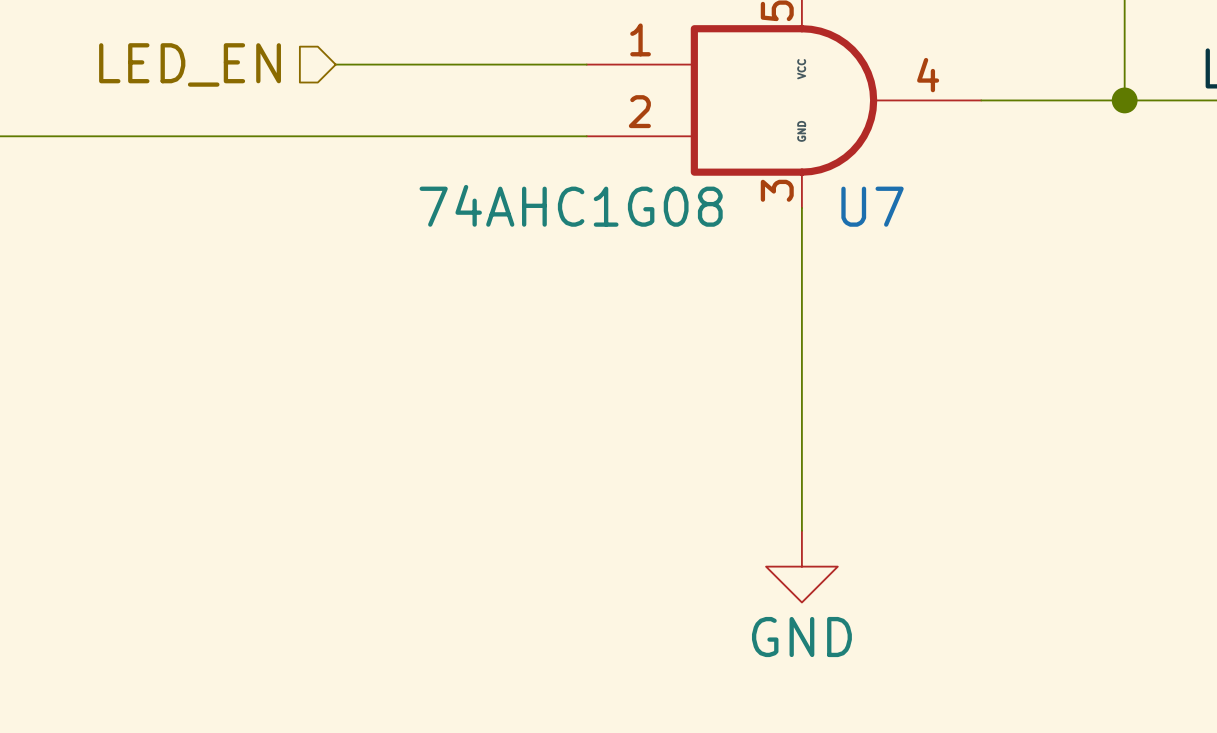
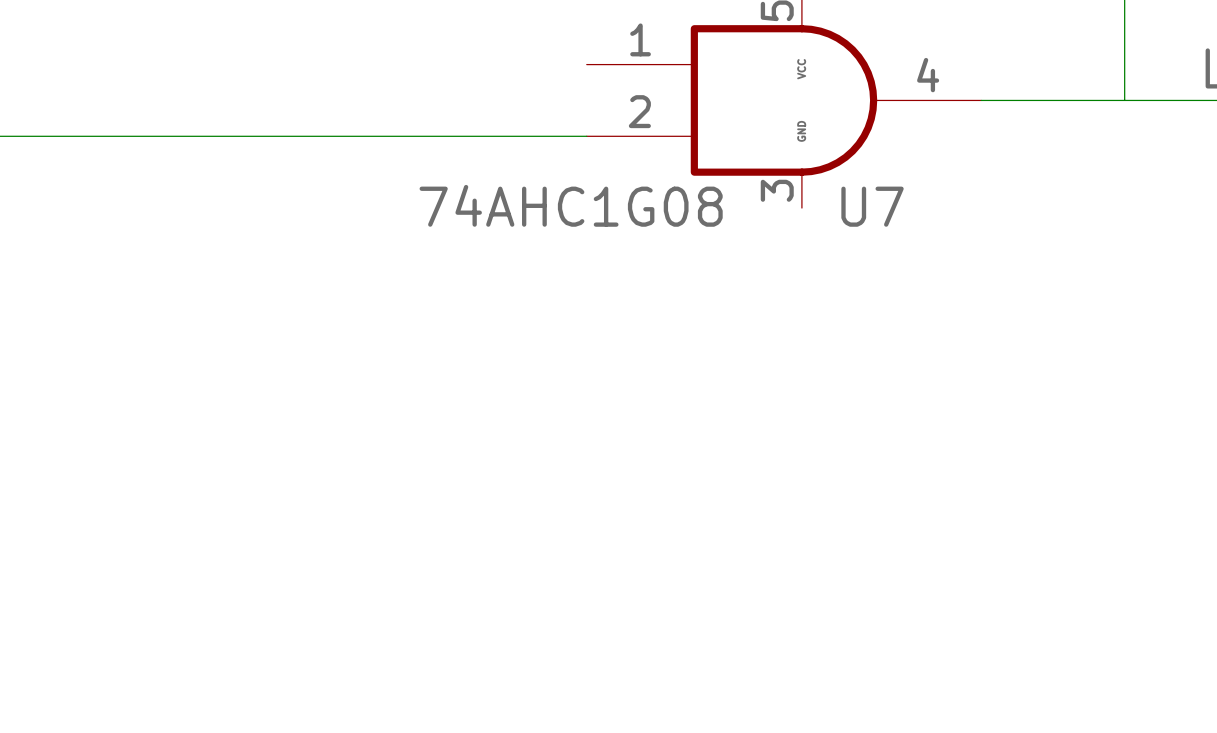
hierarchical label: LED_EN (190, 64) -> none
wire: (335, 64) (586, 64) -> none
junction: (1124, 100) -> none
wire: (801, 208) (801, 530) -> none
power symbol: GND (801, 566) -> none

